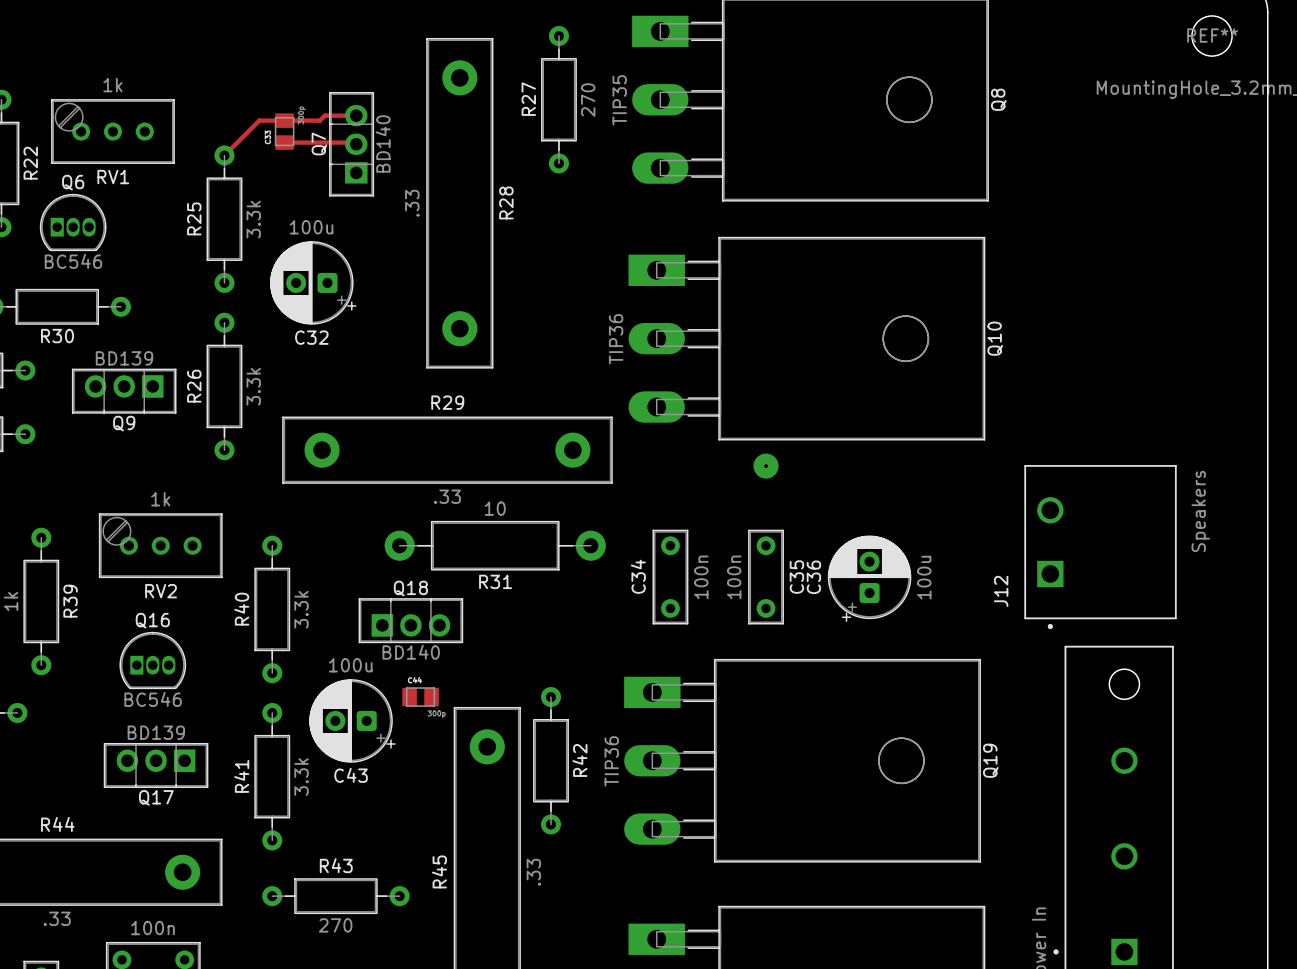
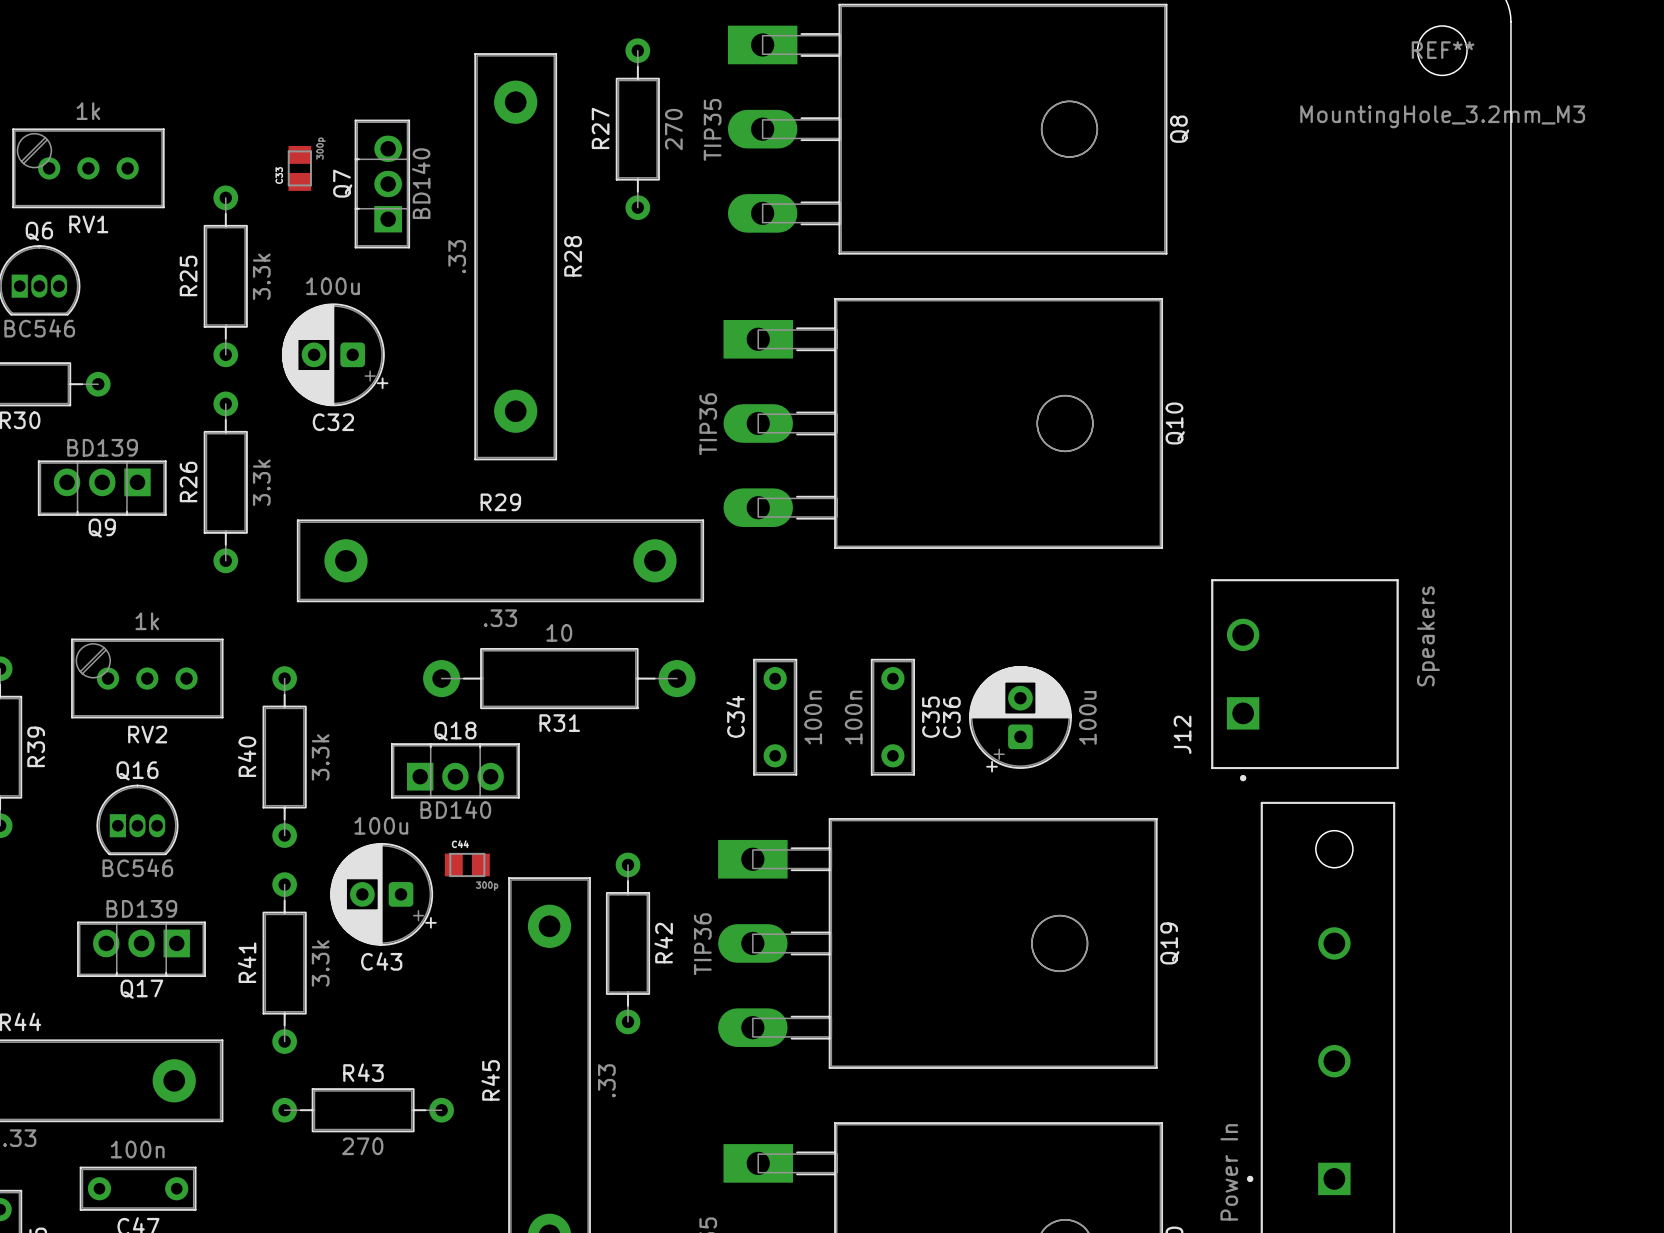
track: (356, 115) (324, 115) (319, 120) (259, 120) (224, 155) -> none
track: (284, 142) (354, 142) (356, 144) -> none
via: (766, 466) -> none

